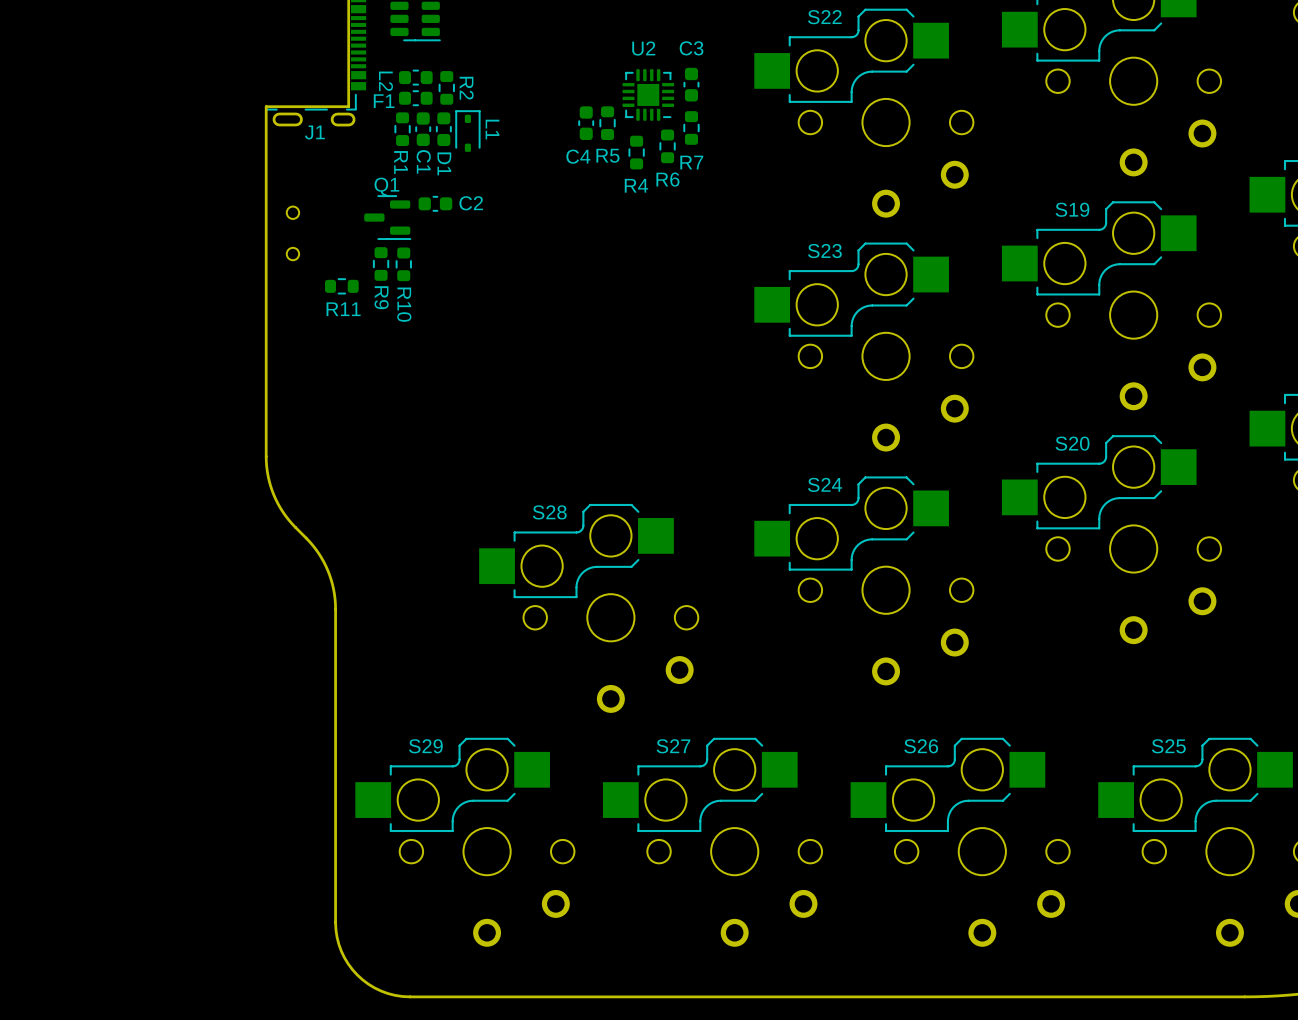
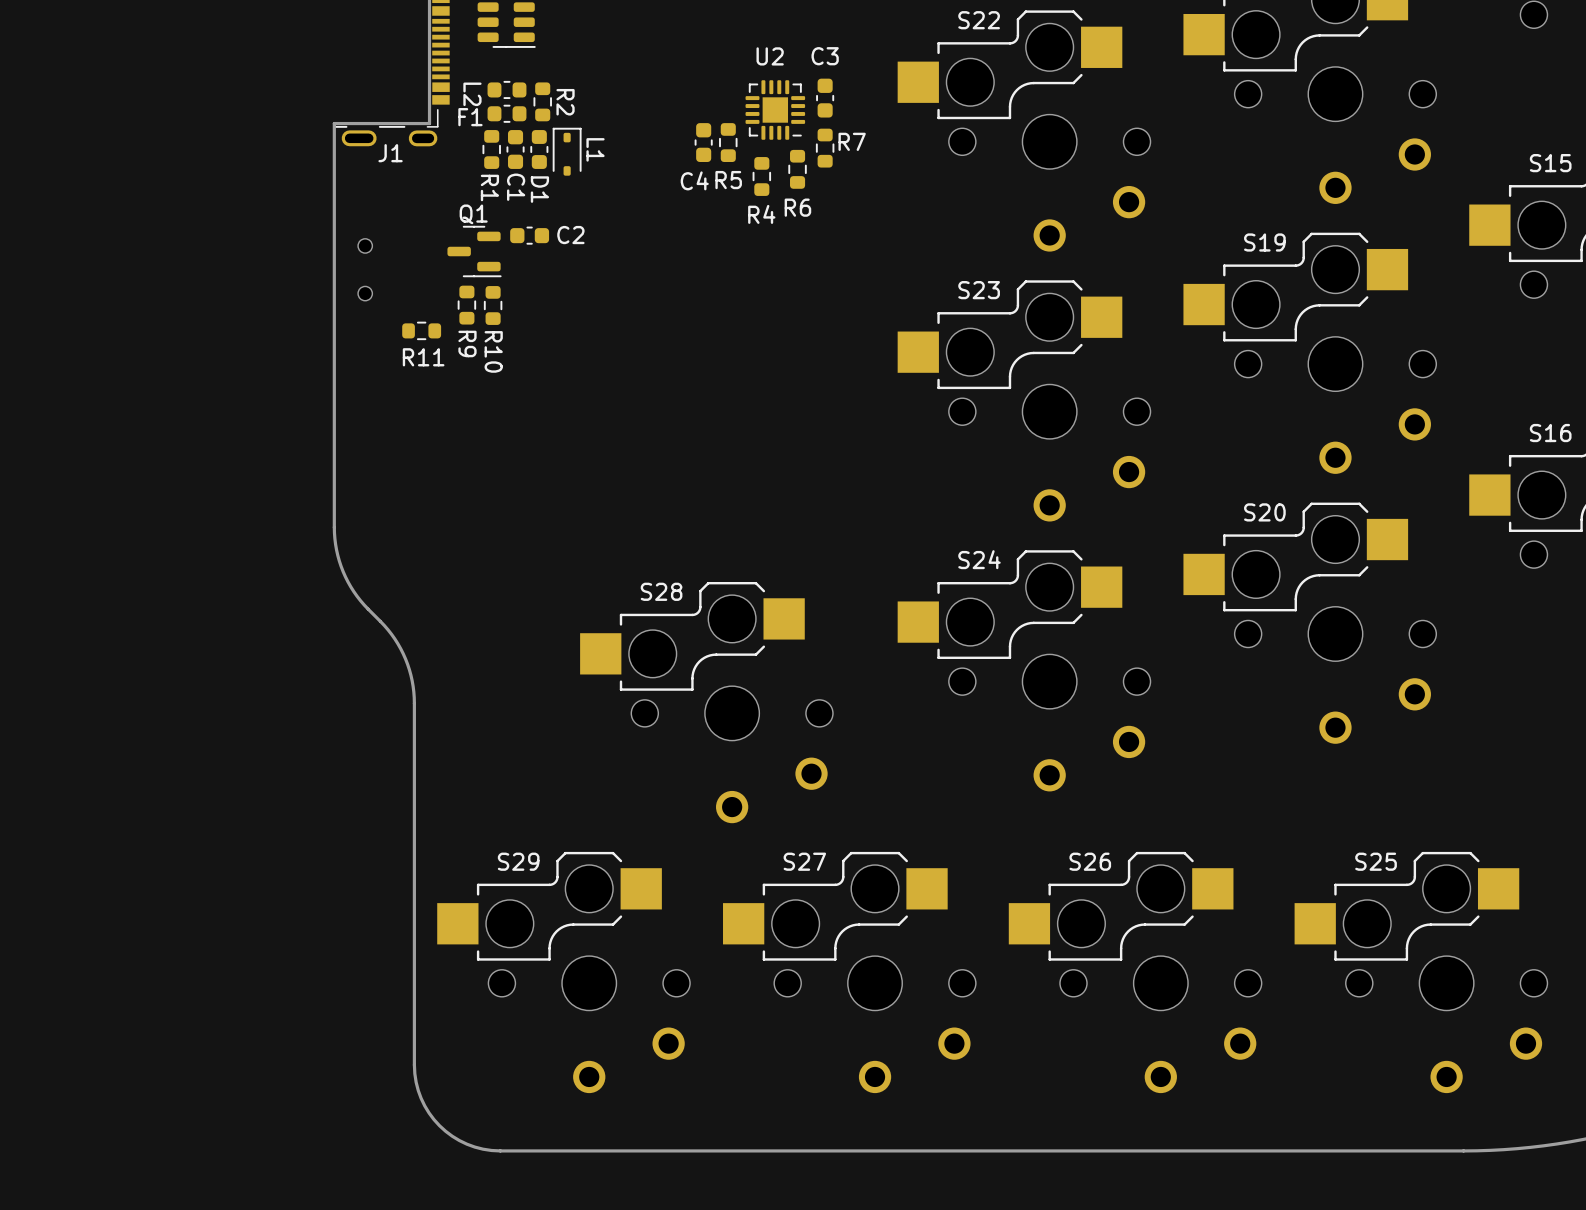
R7 name position: R7 (691, 162) -> R7 (852, 141)

